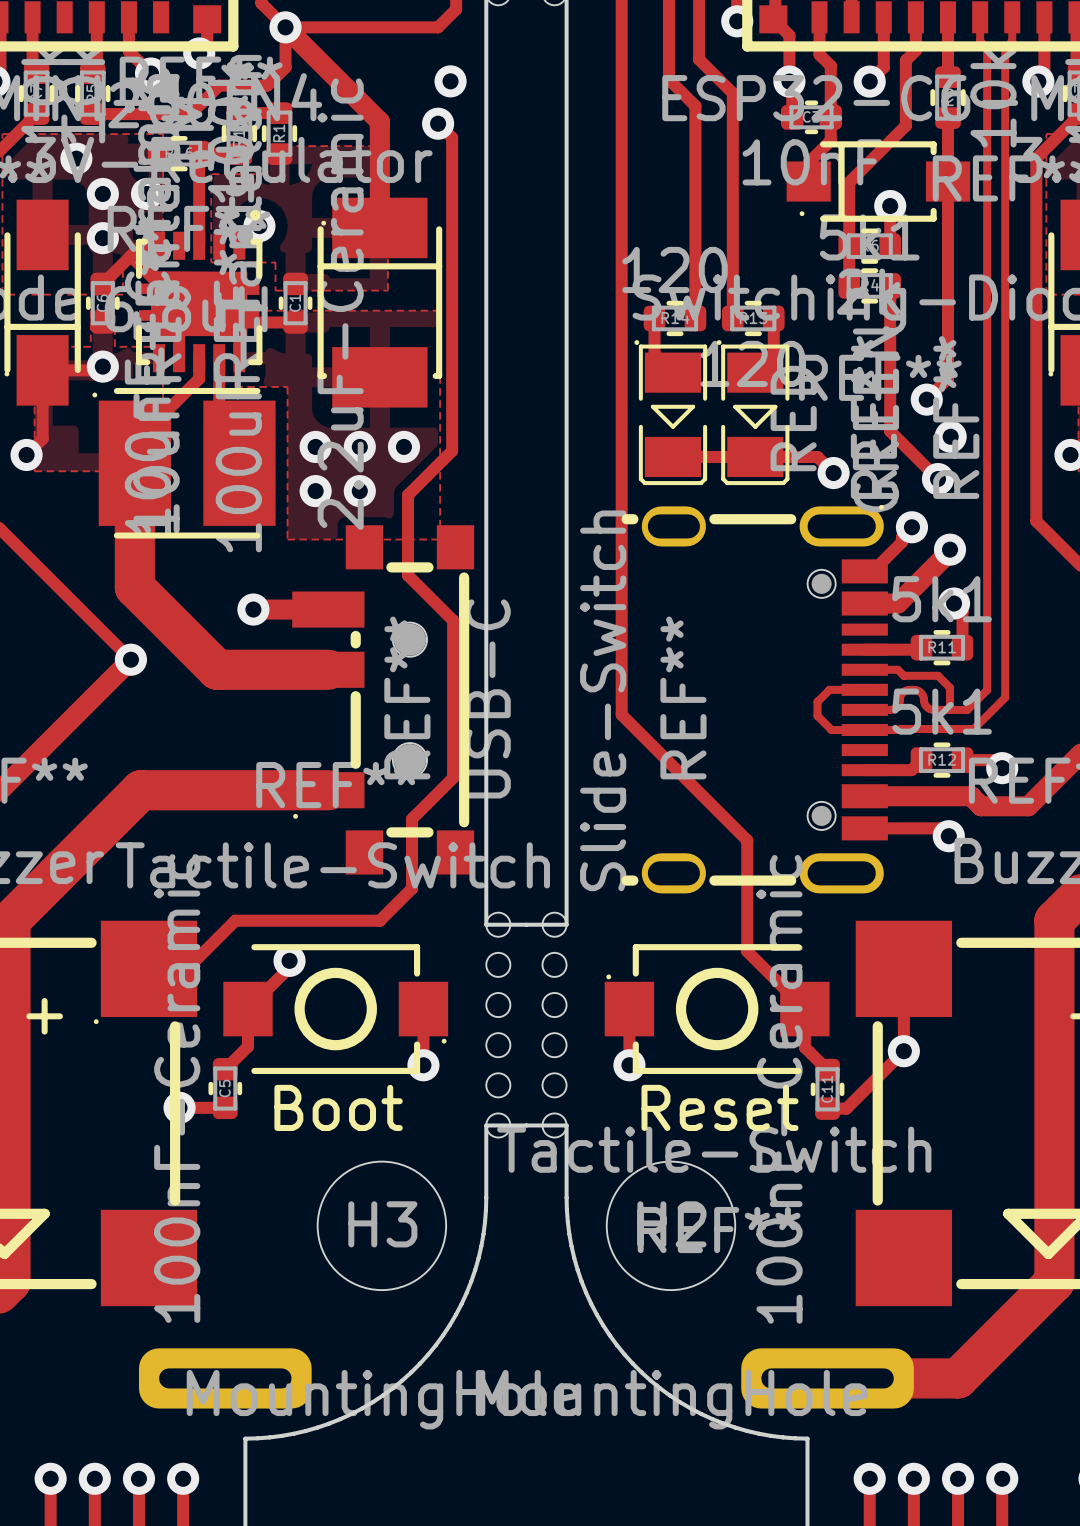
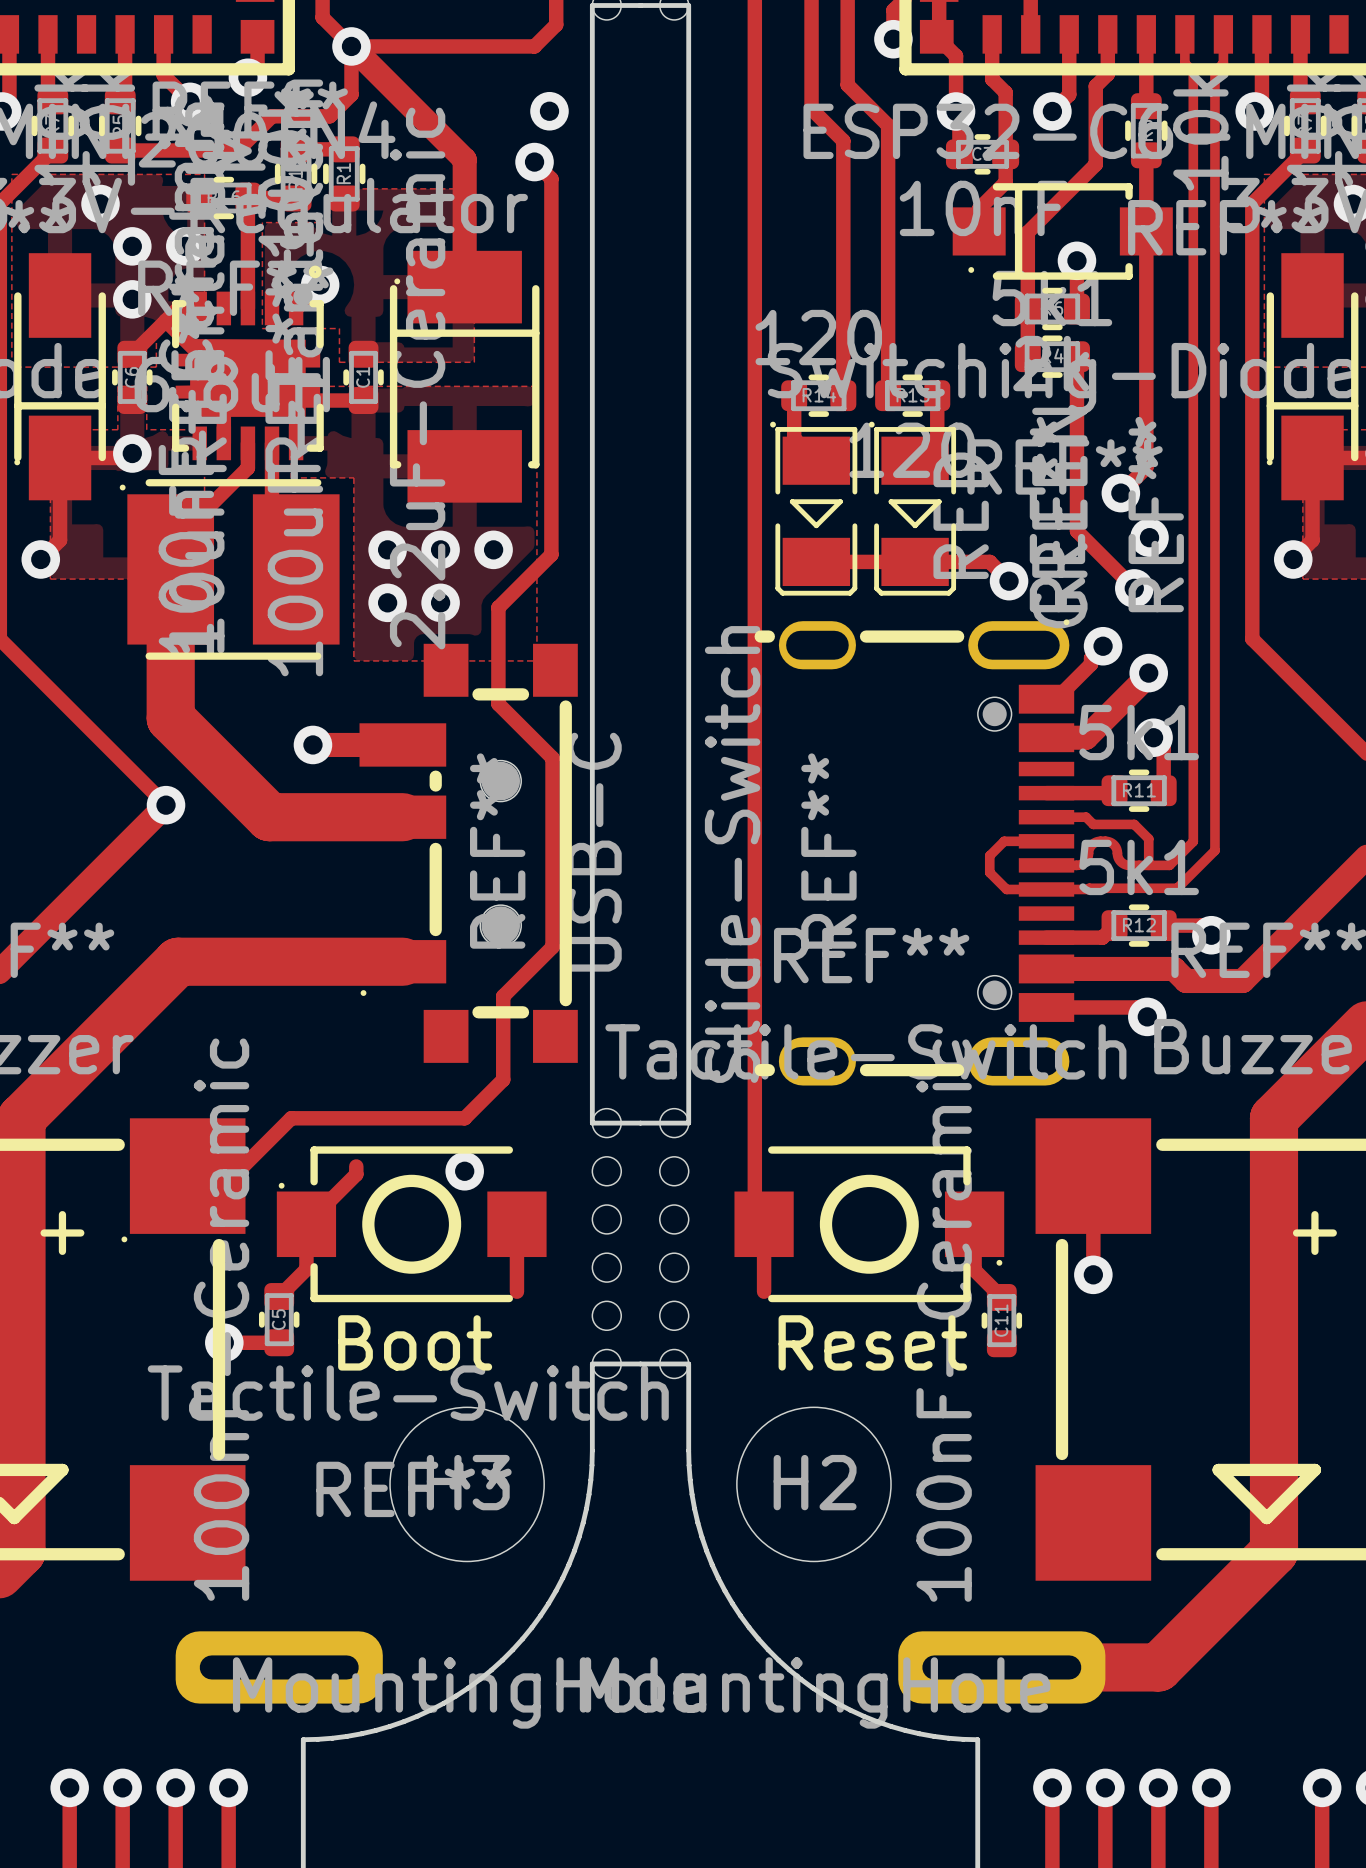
track: (621, 714) (747, 840) (747, 951) (804, 1009) -> (754, 871) (754, 1214)
via: (289, 960) -> none
via: none -> (464, 1171)
part rotation: 0° (335, 1009) -> 180° (411, 1224)
part rotation: 0° (717, 1009) -> 180° (869, 1224)
track: (903, 1051) (846, 1108) (827, 1108) -> none
via: (423, 1065) -> none
via: (629, 1065) -> none

